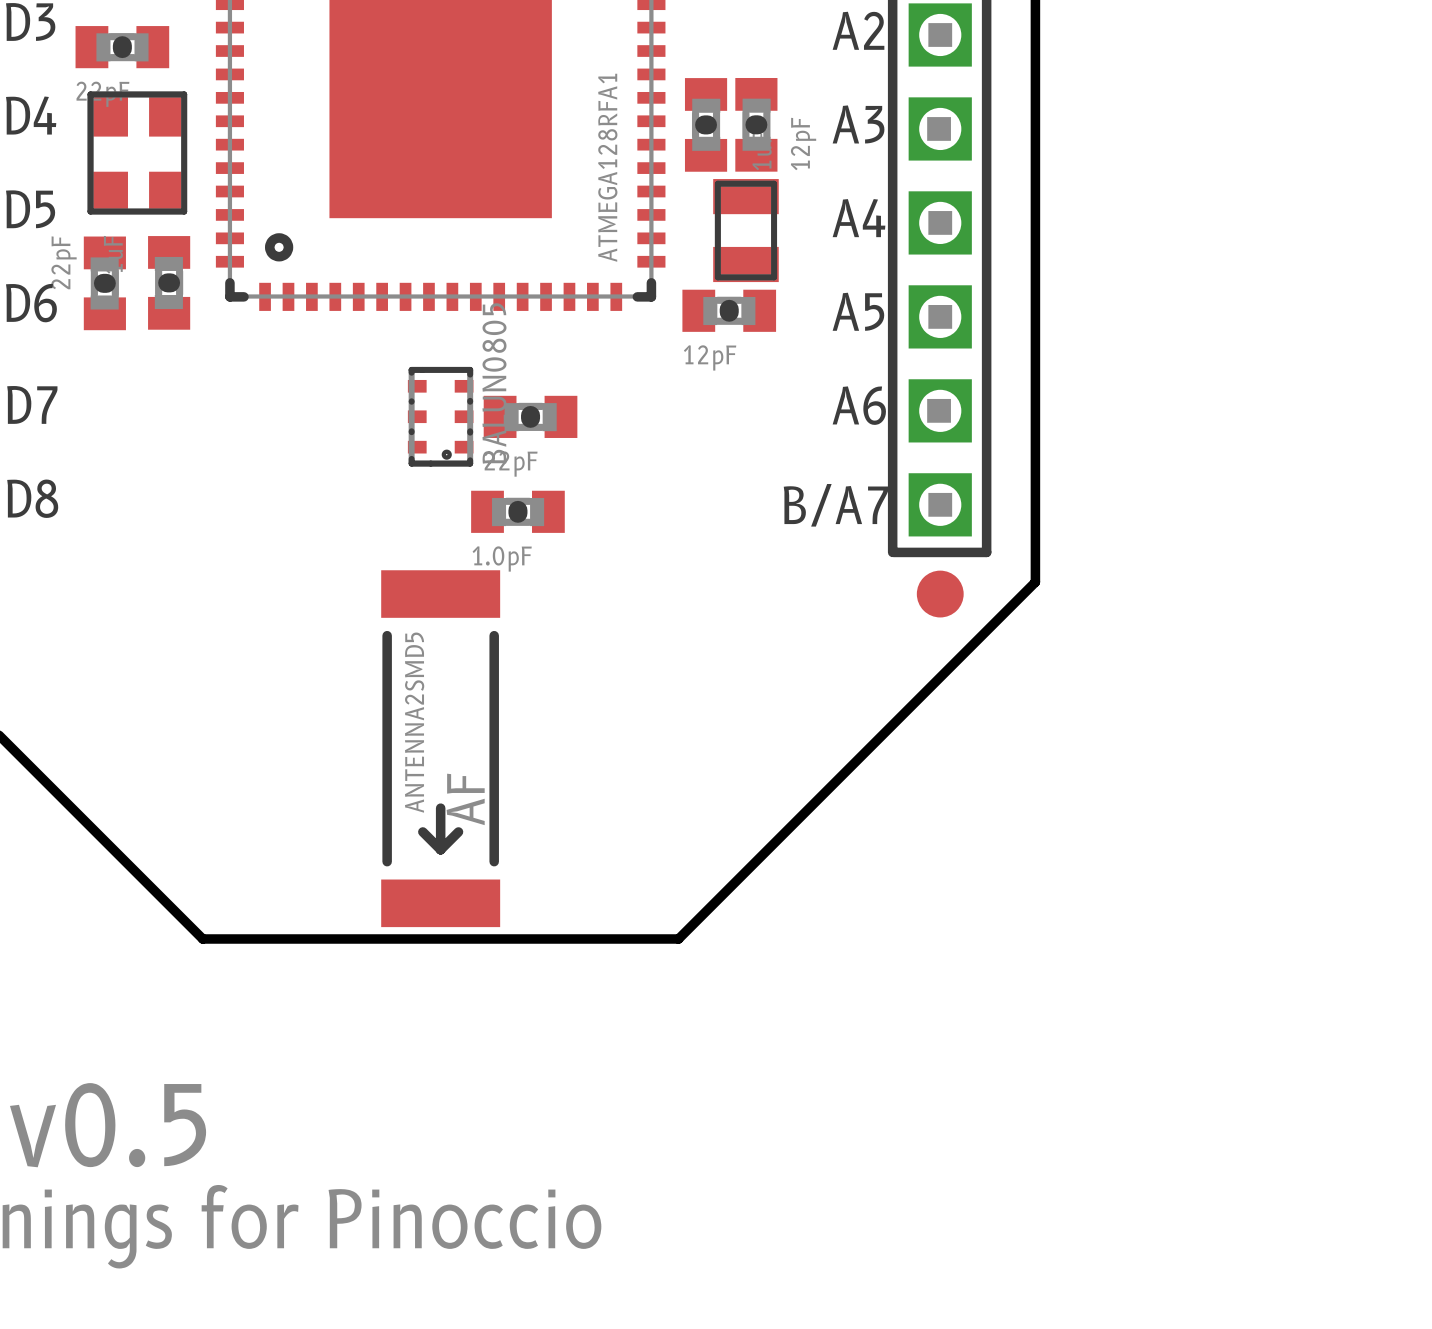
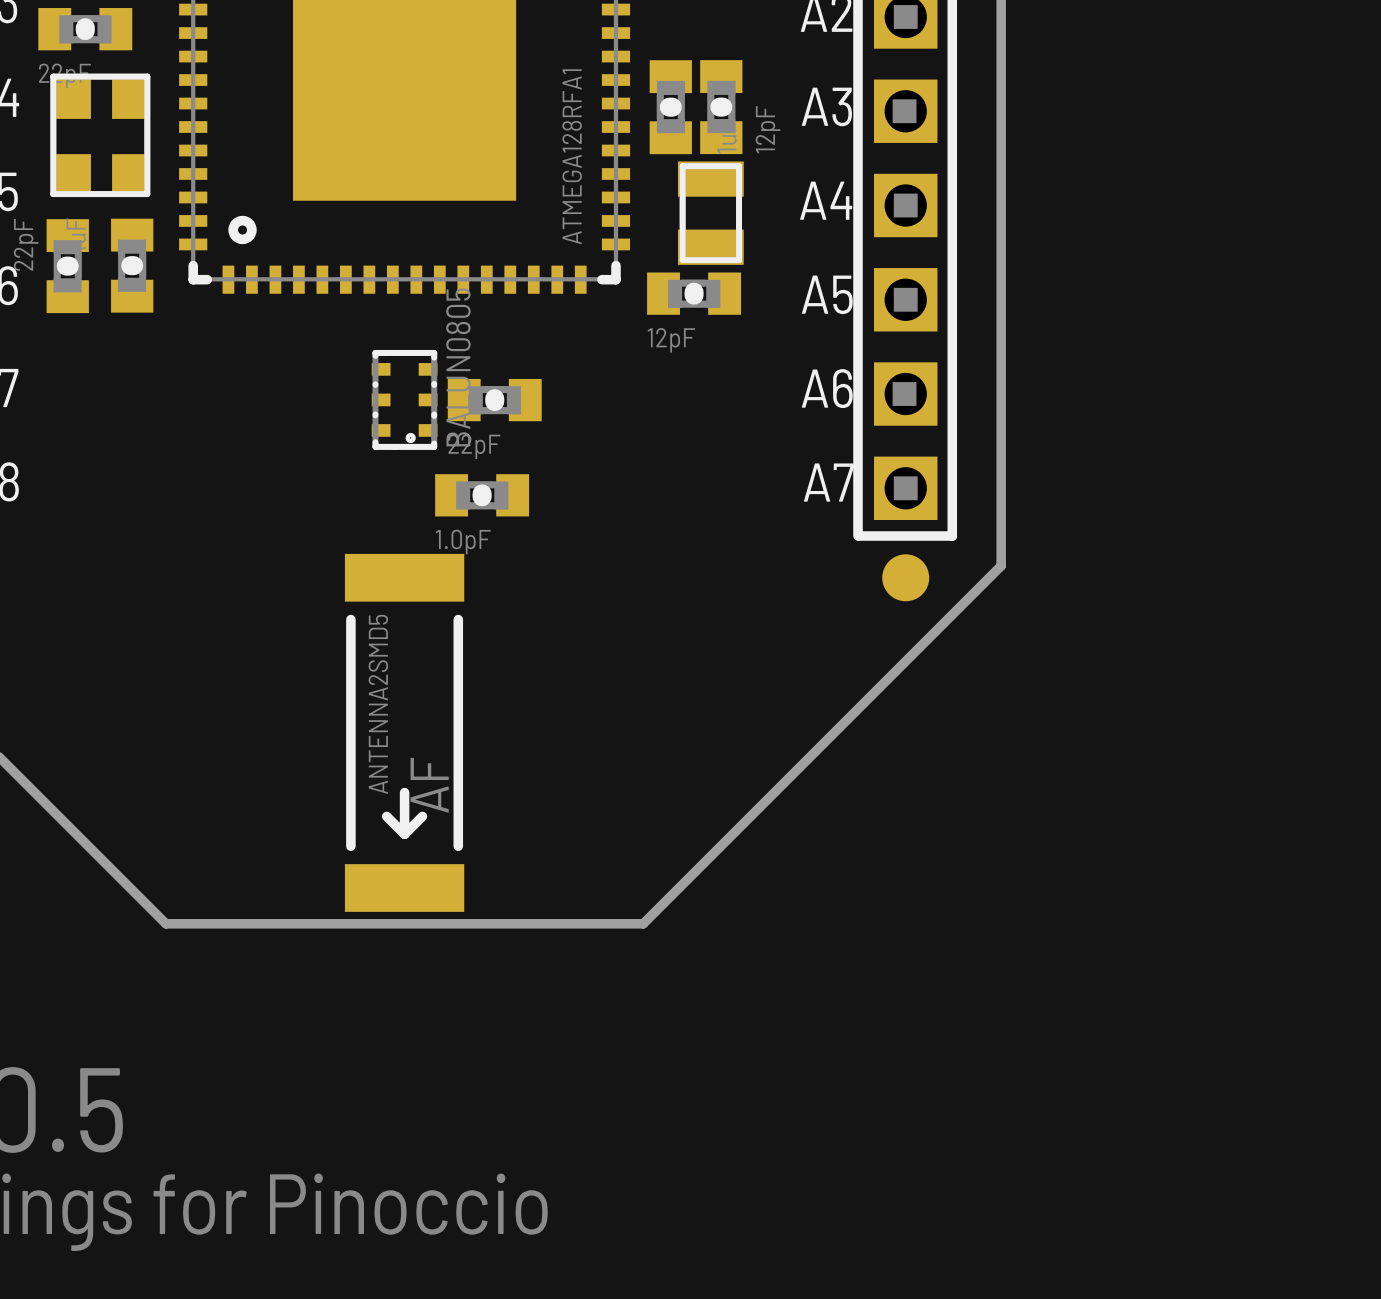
text: B/A7 (836, 505) -> A7 (828, 482)

